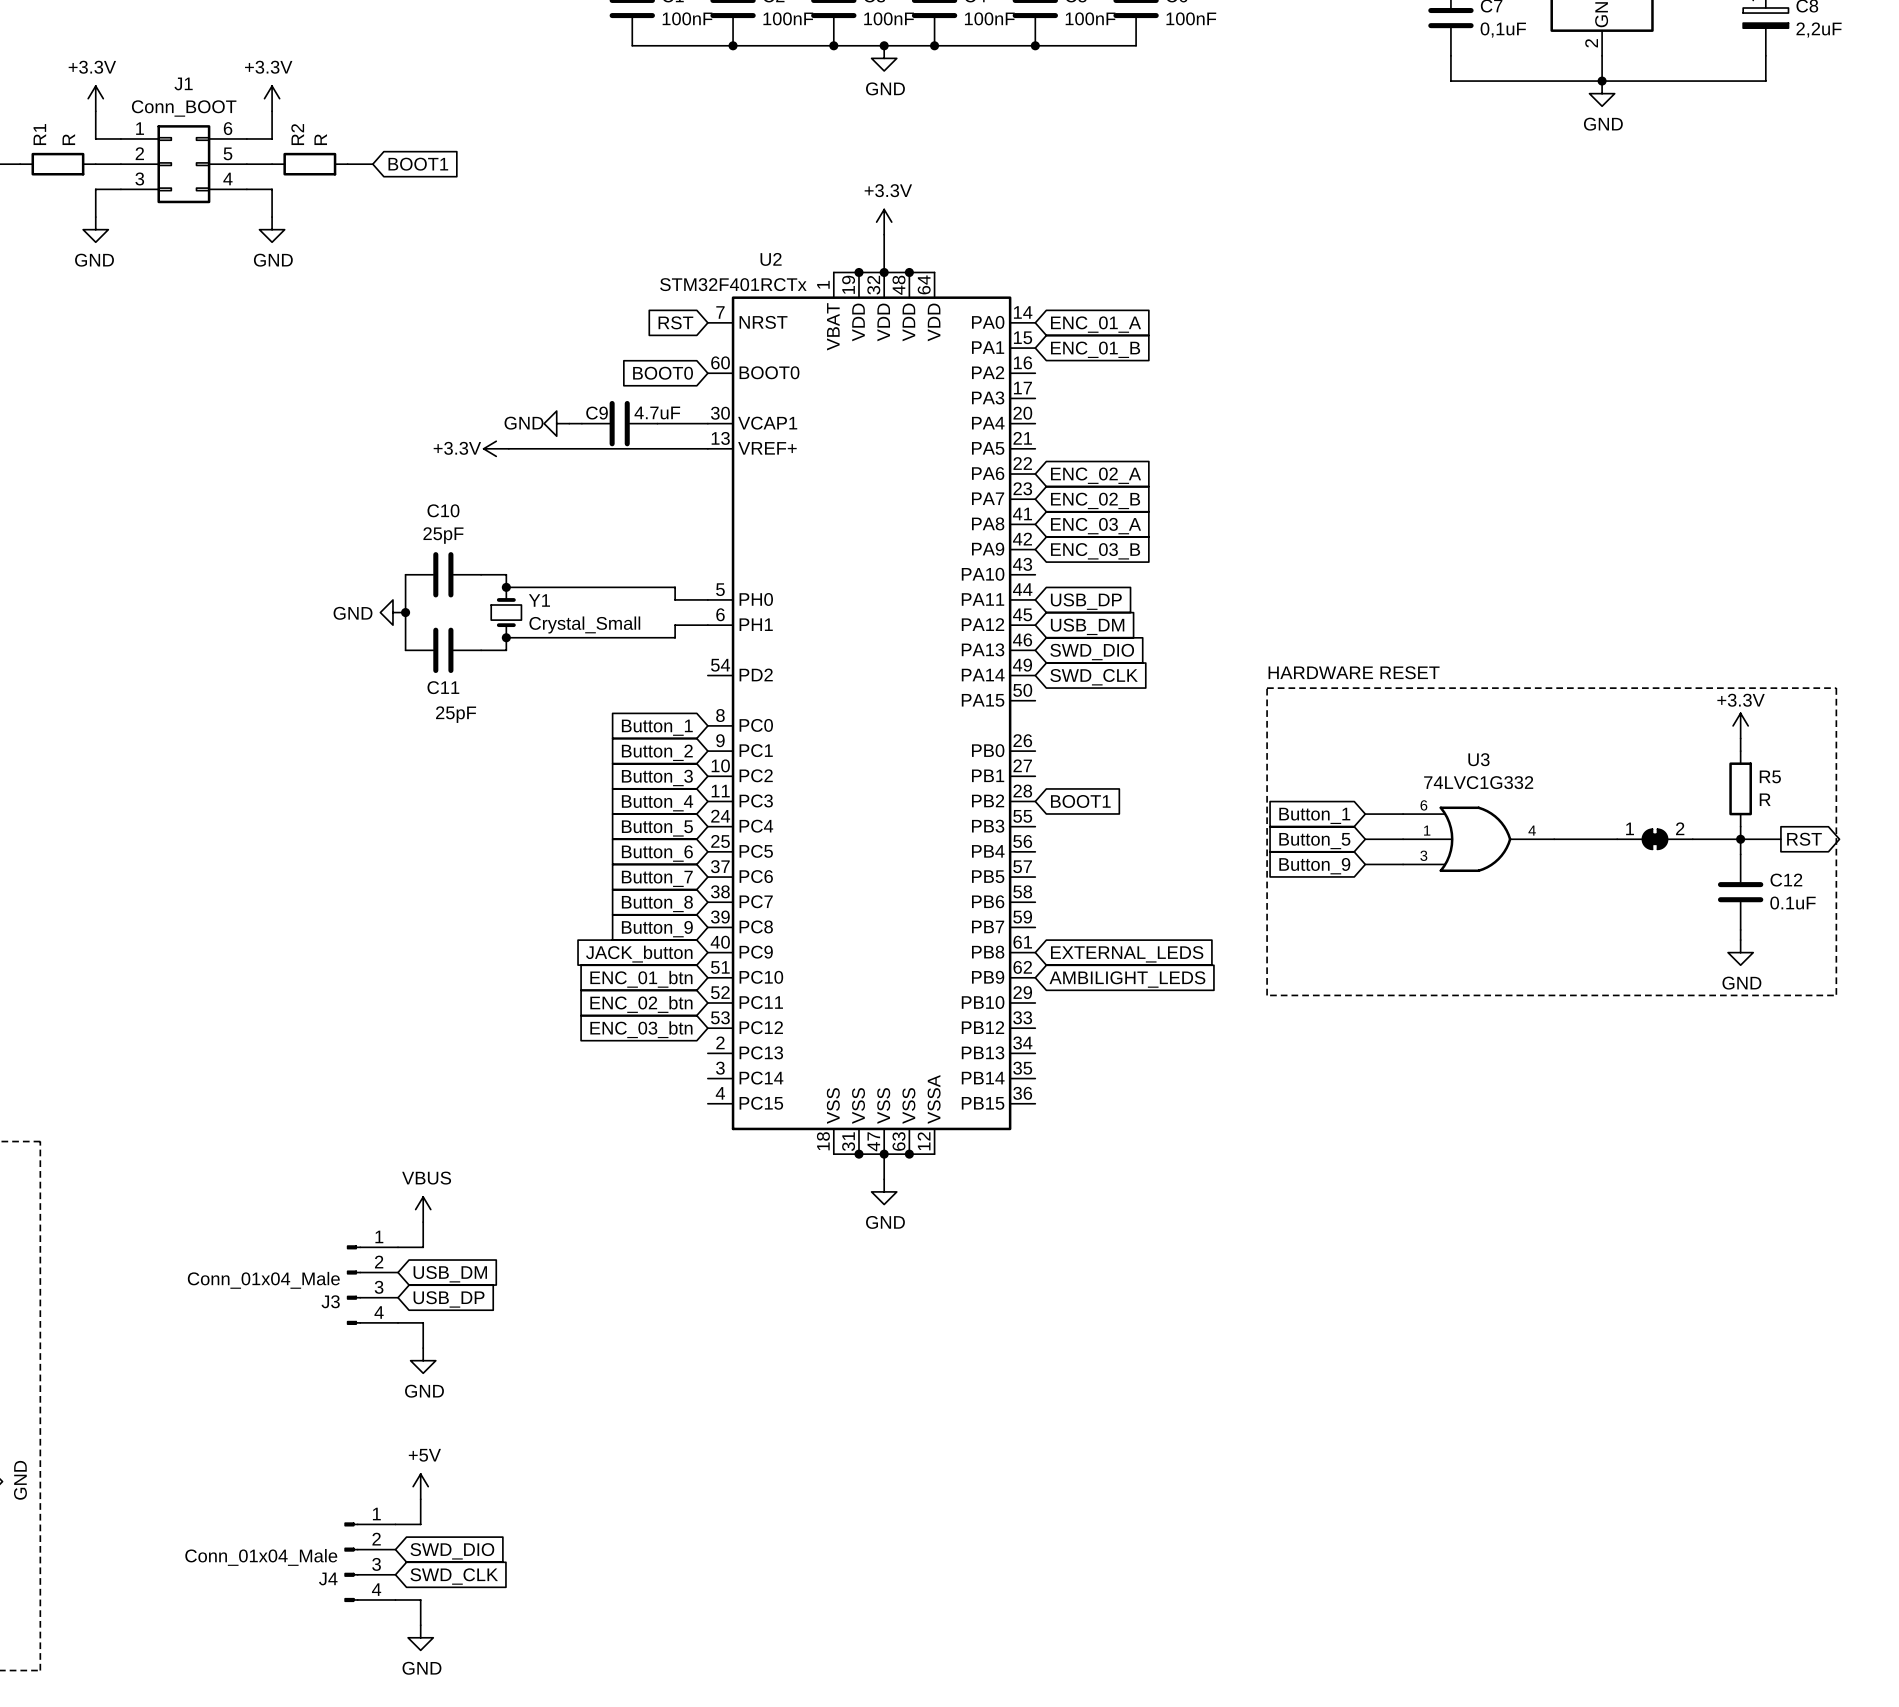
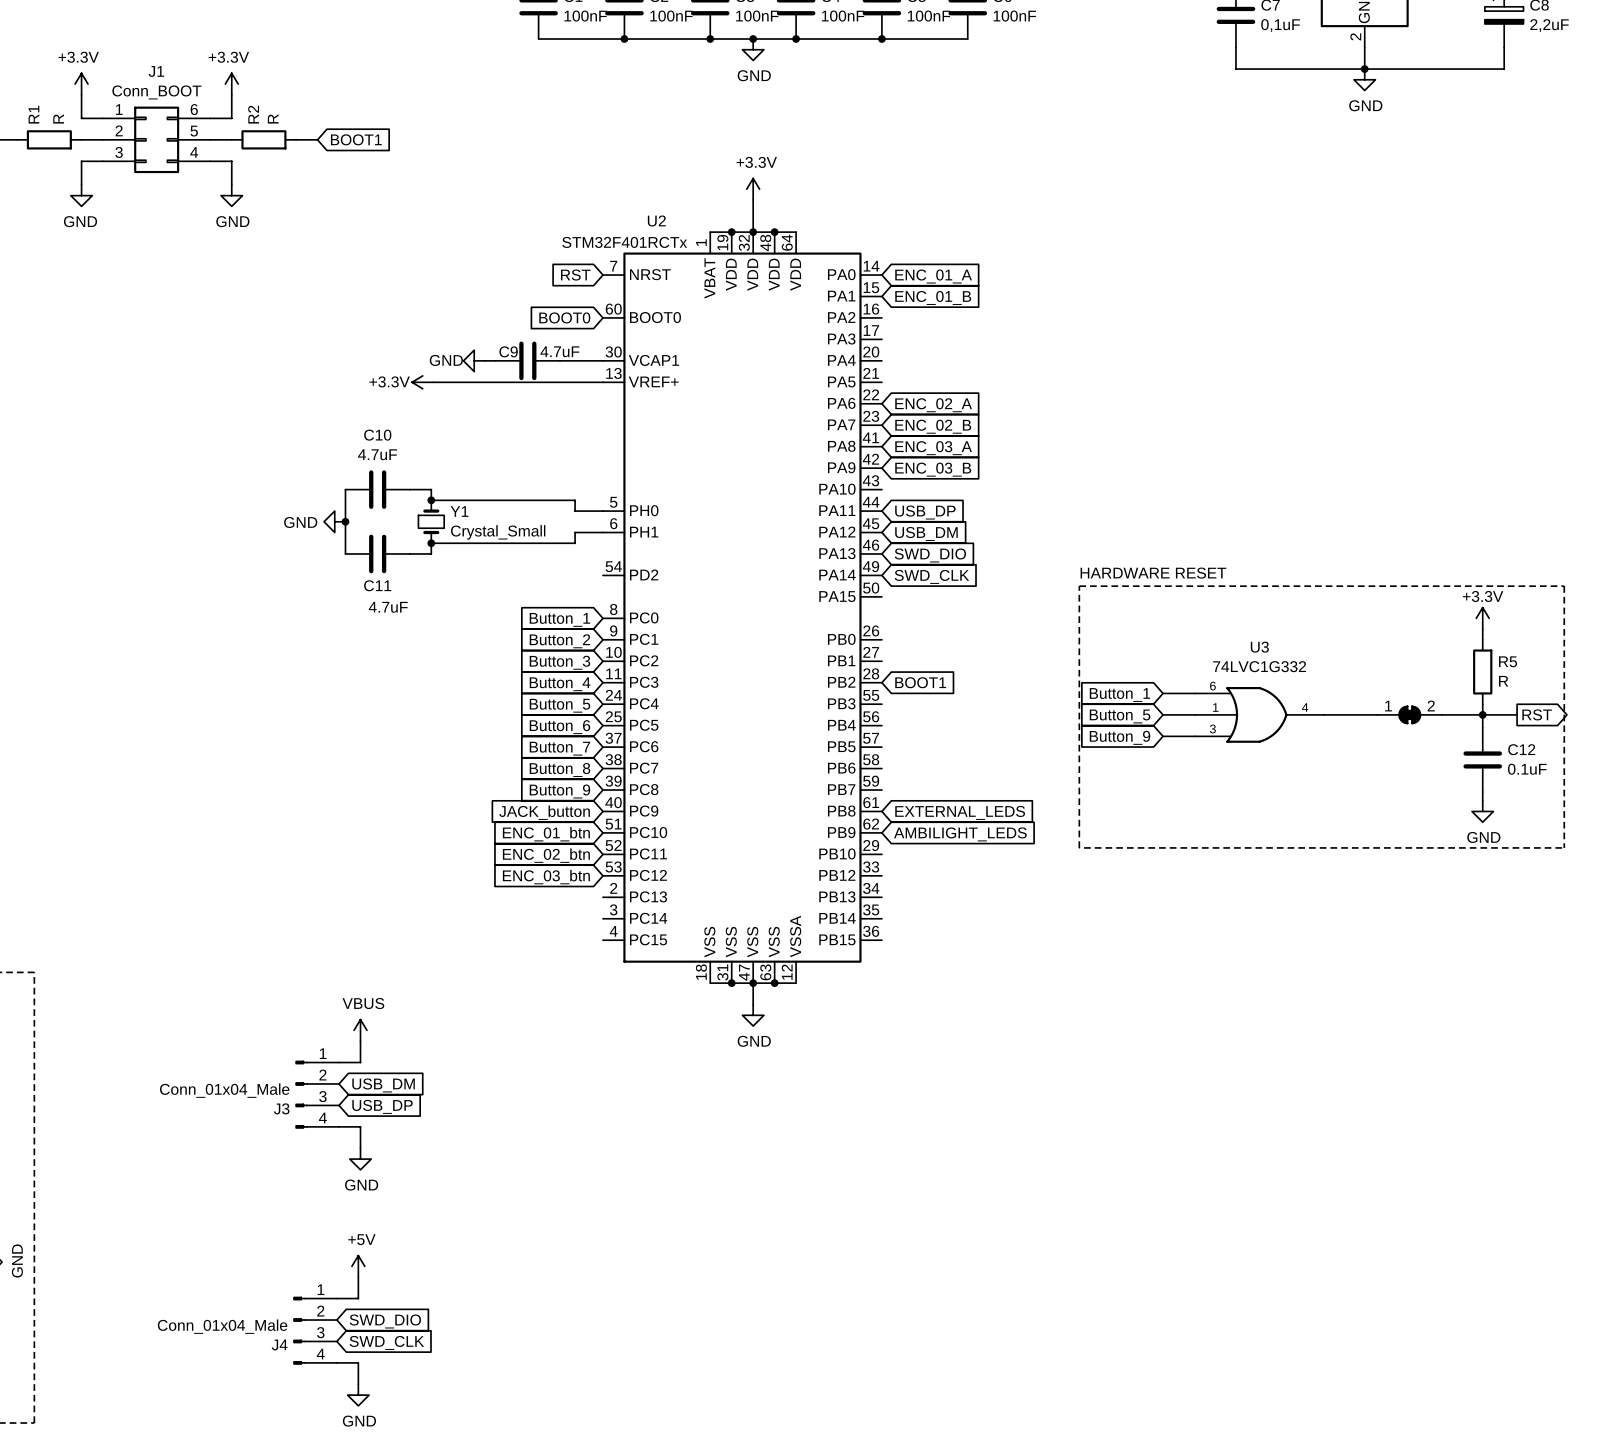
C10 value: 25pF (443, 535) -> 4.7uF (377, 454)
C11 value: 25pF (456, 714) -> 4.7uF (388, 607)

